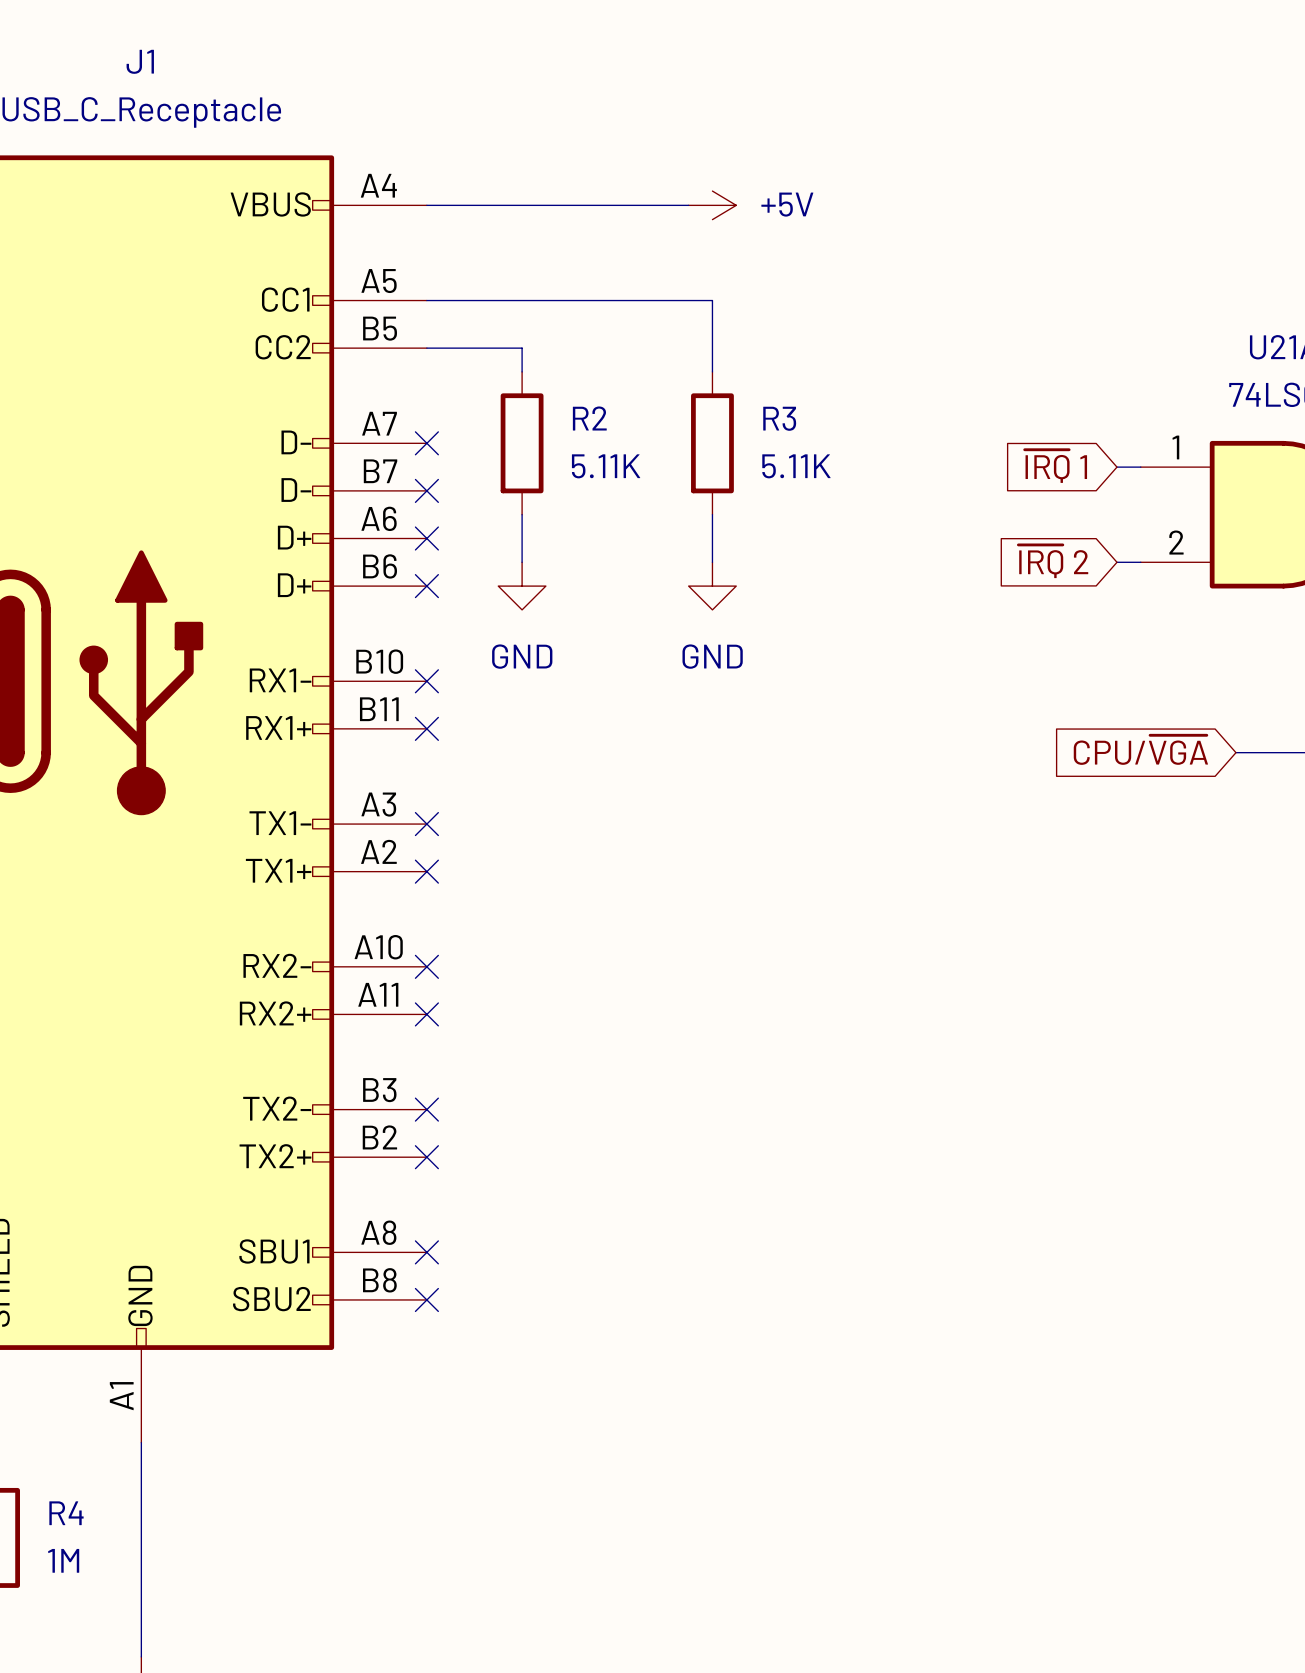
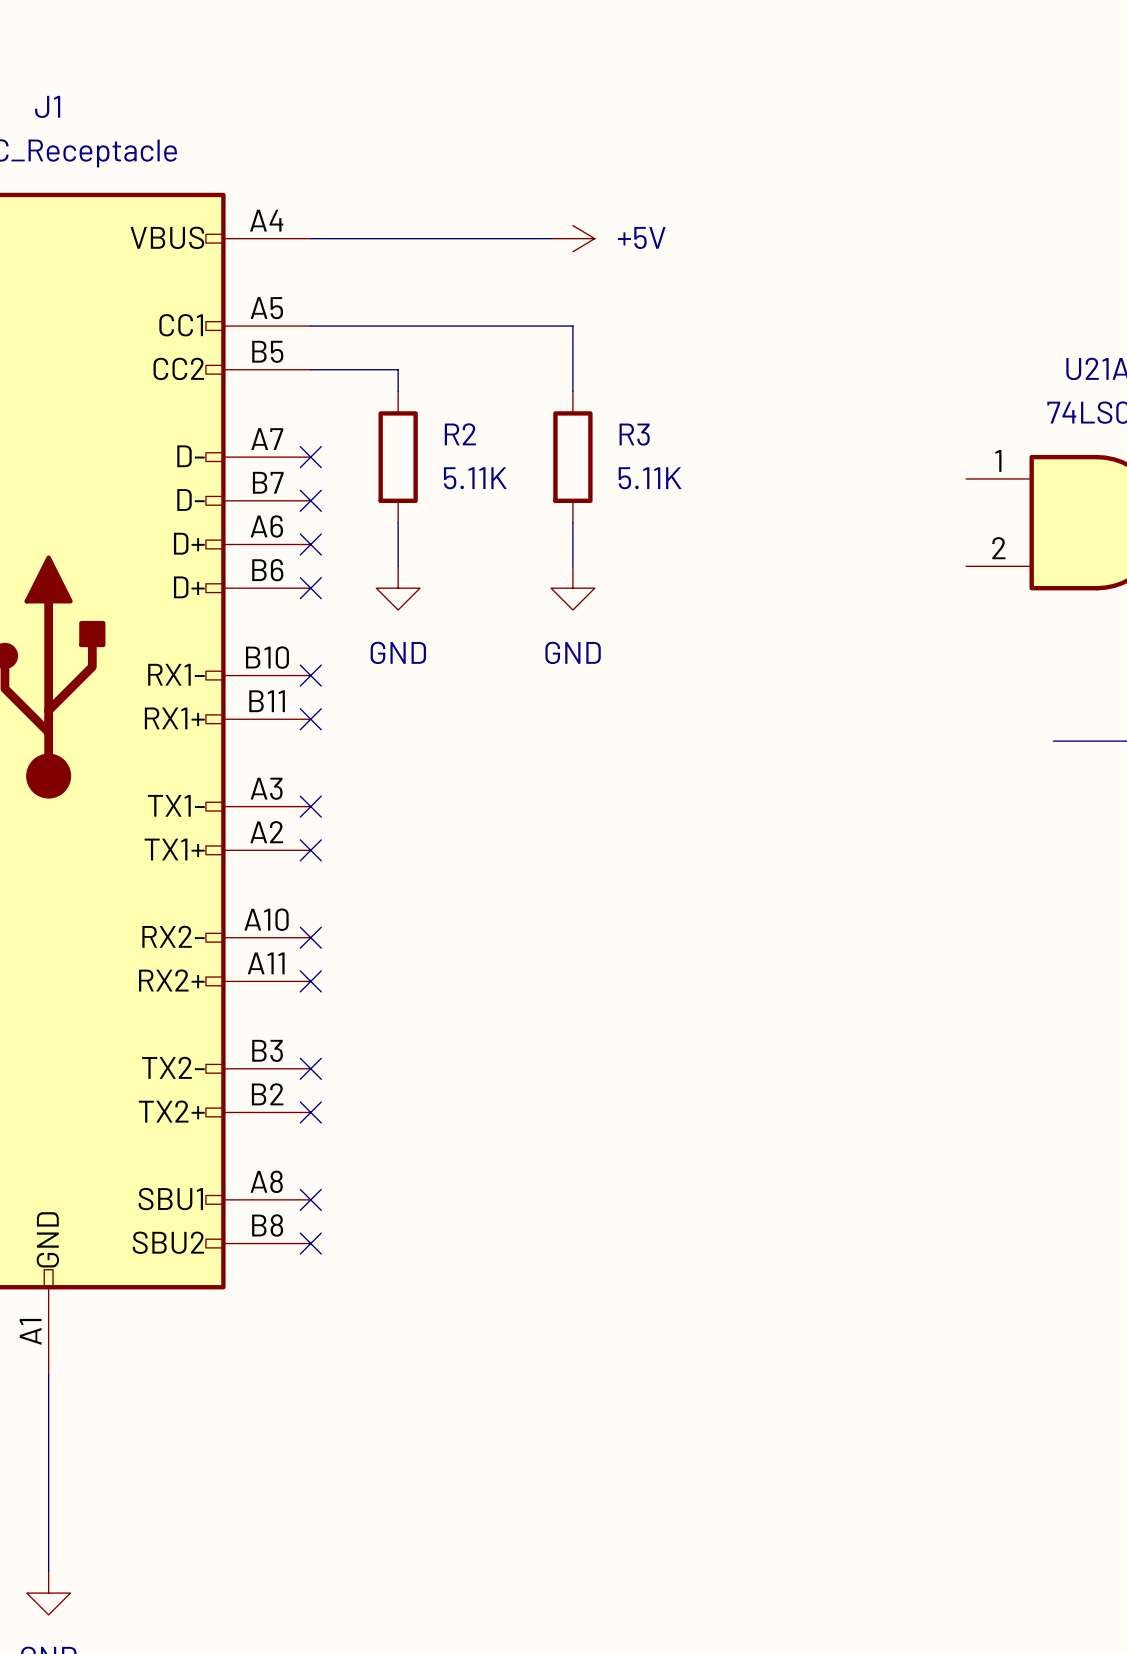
global label: ~{IRQ} 1 (1055, 466) -> none
wire: (1116, 467) (1140, 467) -> none
global label: ~{IRQ} 2 (1053, 561) -> none
wire: (1116, 562) (1140, 562) -> none
global label: CPU/~{VGA} (1140, 750) -> none

